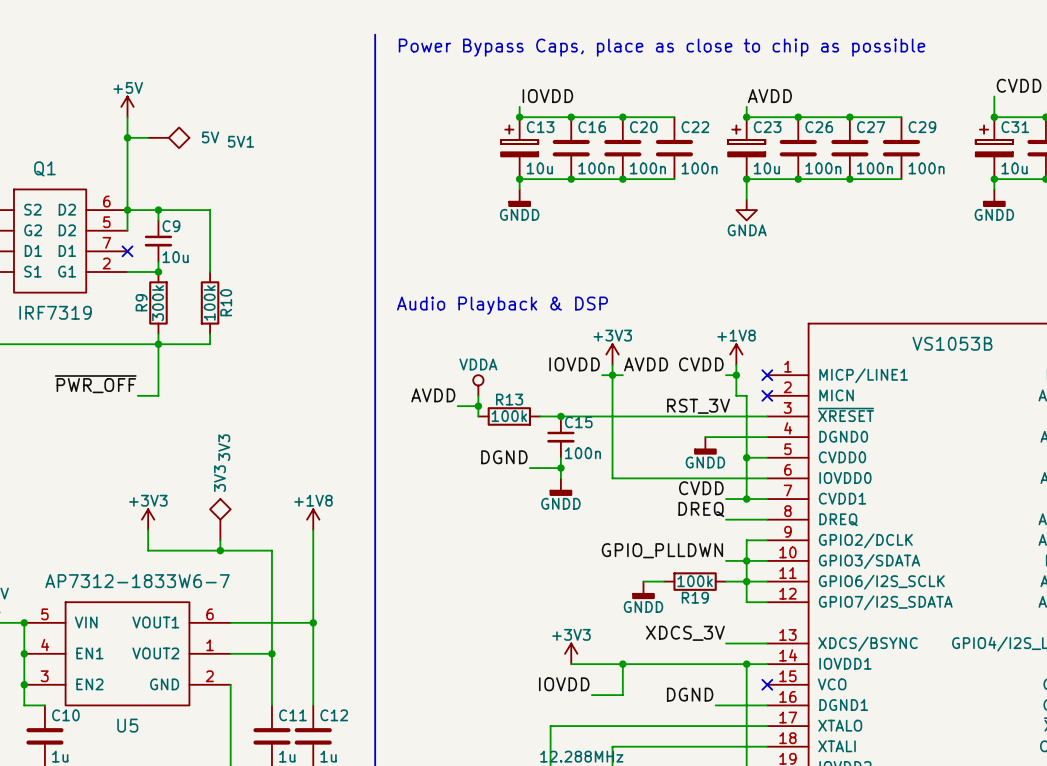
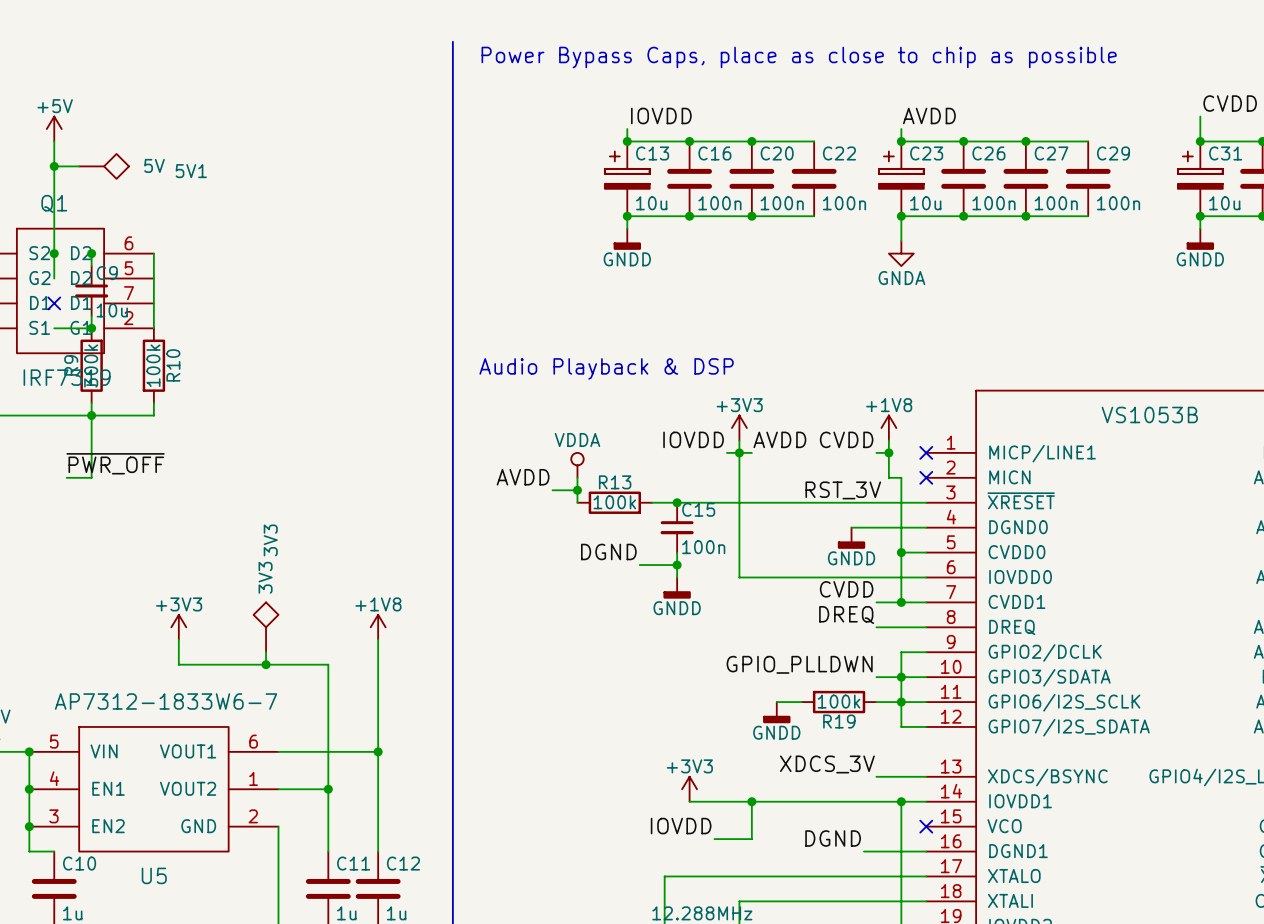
power symbol position: +5V (127, 106) -> +5V (54, 129)
wire: none -> (54, 141) (54, 278)
wire: (127, 117) (127, 210) (210, 210) (210, 272) -> none
junction: none -> (54, 166)
wire: (127, 137) (148, 137) -> (54, 166) (79, 166)
junction: (127, 137) -> none
5V1 position: (168, 137) -> (104, 166)
junction: none -> (54, 253)
junction: none -> (91, 253)
junction: (127, 210) -> none
wire: (158, 210) (158, 220) -> (91, 253) (91, 266)
junction: (158, 210) -> none
C9 position: (158, 241) -> (91, 290)
no-connect mark: none -> (54, 303)
no-connect mark: (127, 251) -> none
wire: none -> (91, 315) (91, 328) (54, 328)
wire: (158, 261) (158, 272) (127, 272) -> (153, 278) (153, 328)
junction: none -> (91, 328)
junction: (158, 272) -> none
R9 position: (158, 302) -> (91, 365)
R10 position: (210, 302) -> (153, 365)
wire: (158, 333) (158, 395) (137, 395) -> (91, 403) (91, 477) (66, 477)
wire: (210, 333) (210, 344) (127, 344) -> (153, 403) (153, 415)
junction: none -> (91, 415)
junction: (158, 344) -> none

